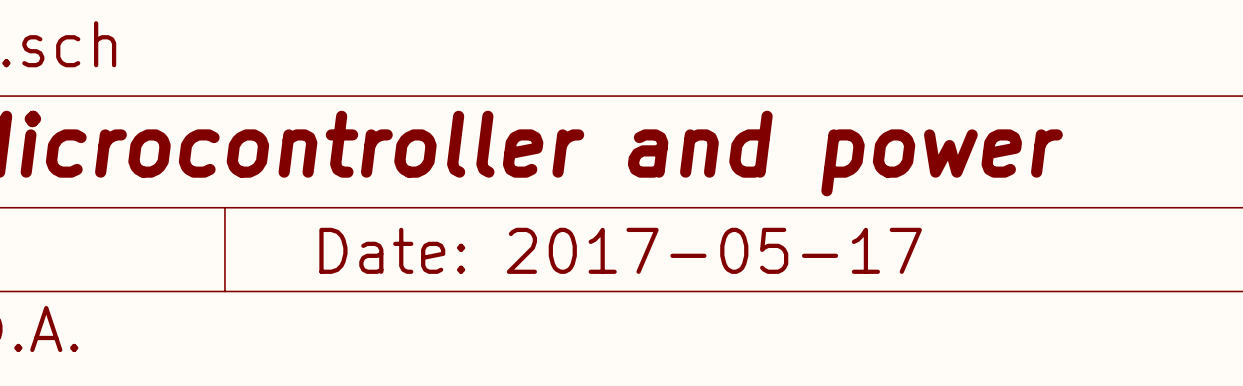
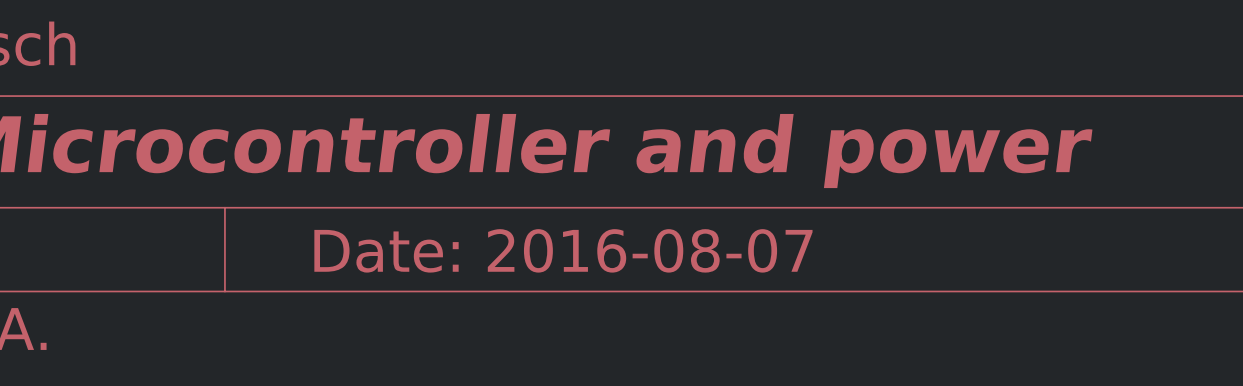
title block: Date: 2017-05-17 (620, 250) -> Date: 2016-08-07 (563, 250)

